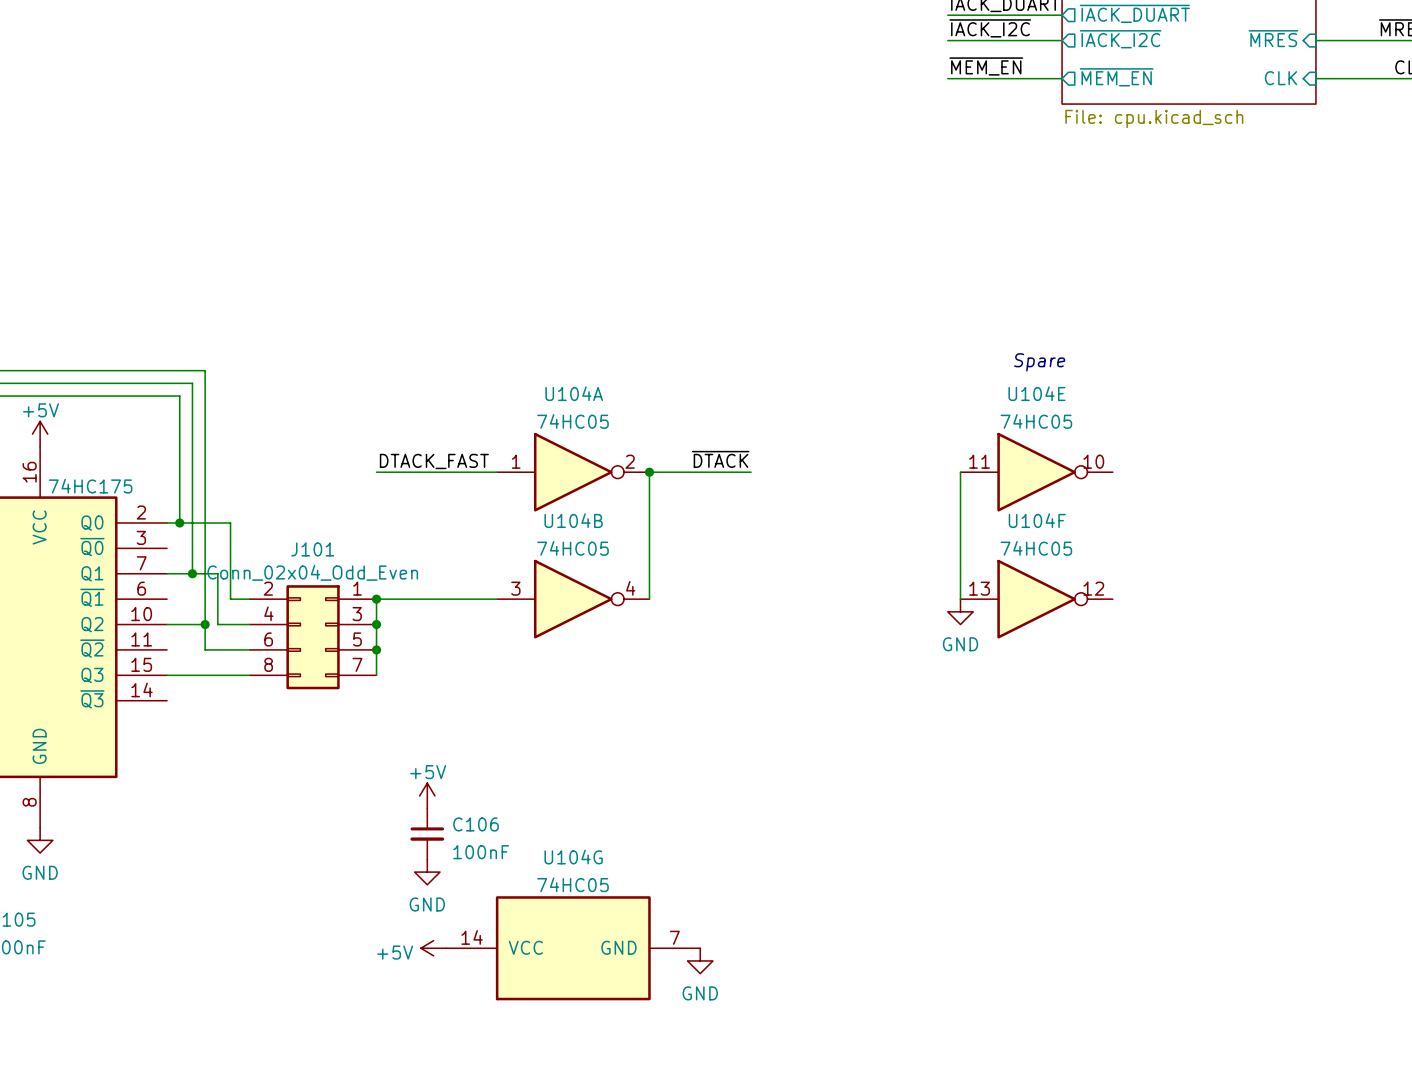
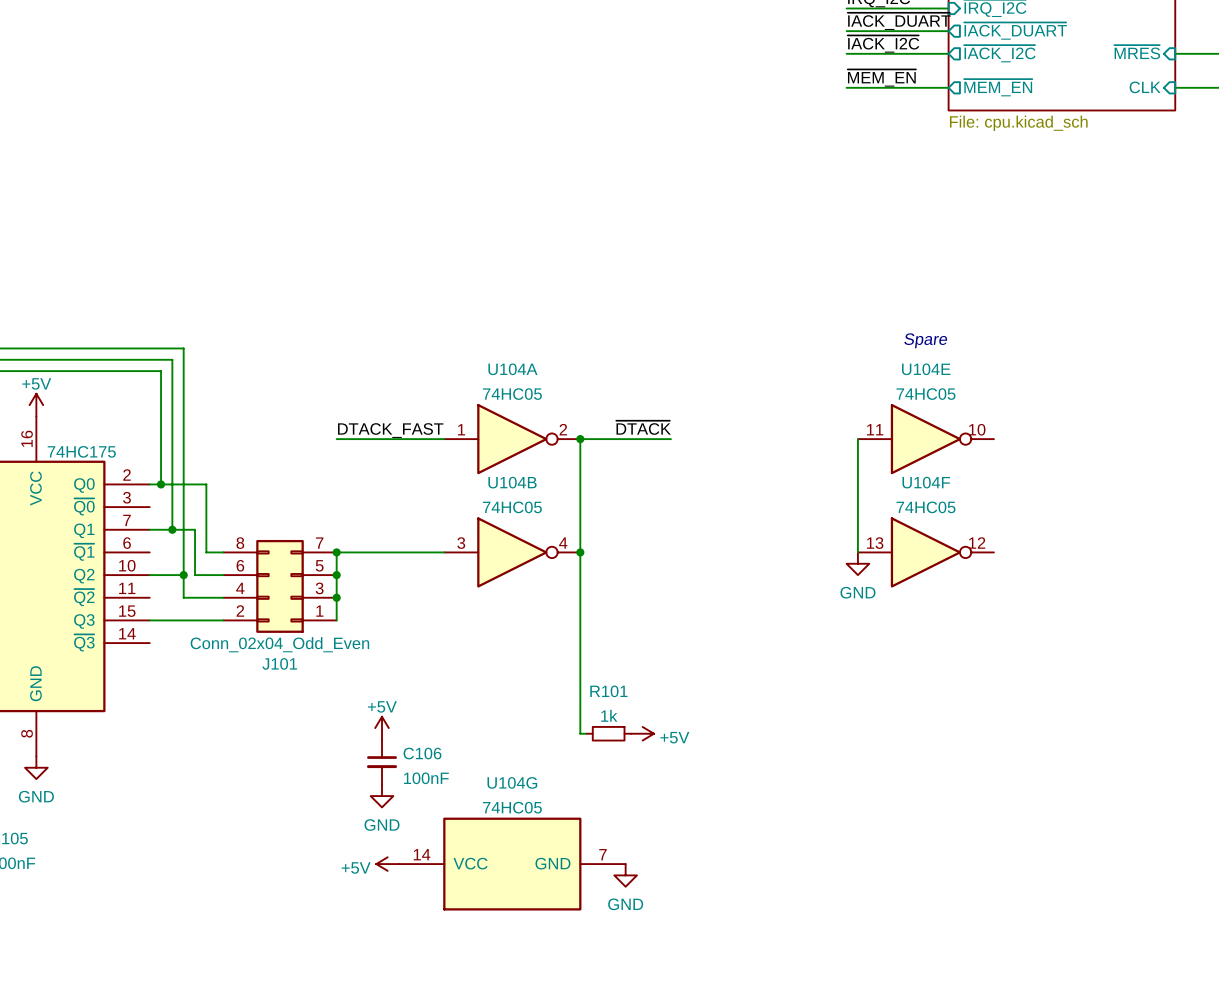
wire: none -> (580, 552) (580, 733) (585, 733)
junction: none -> (580, 552)
J101 flip: as is (313, 637) -> up-down (280, 586)
R101: none -> 1k (608, 733)
power symbol: none -> +5V (642, 733)

